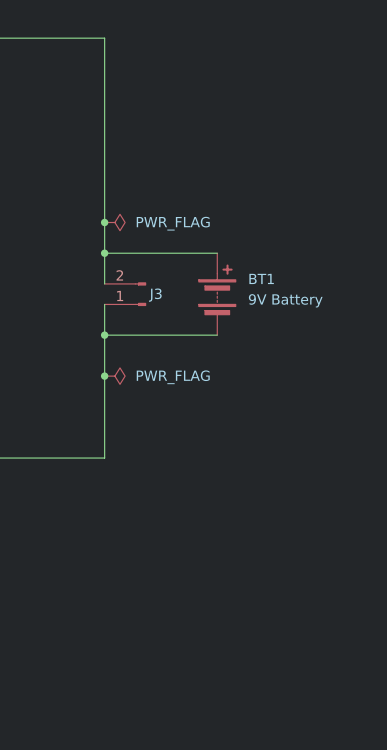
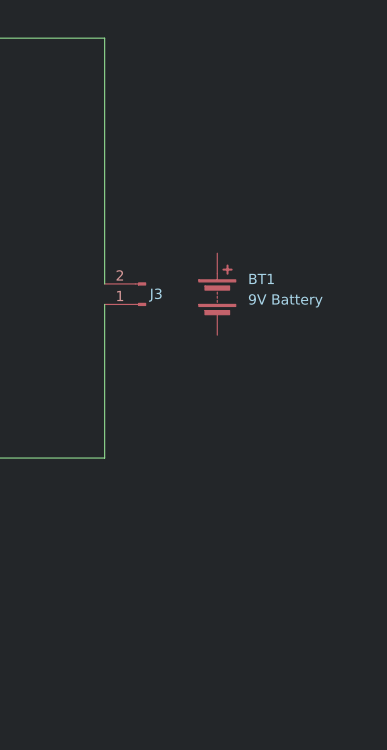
junction: (104, 222) -> none
power symbol: PWR_FLAG (114, 222) -> none
wire: (104, 253) (217, 253) -> none
junction: (104, 253) -> none
wire: (104, 335) (217, 335) -> none
junction: (104, 335) -> none
junction: (104, 376) -> none
power symbol: PWR_FLAG (114, 376) -> none

